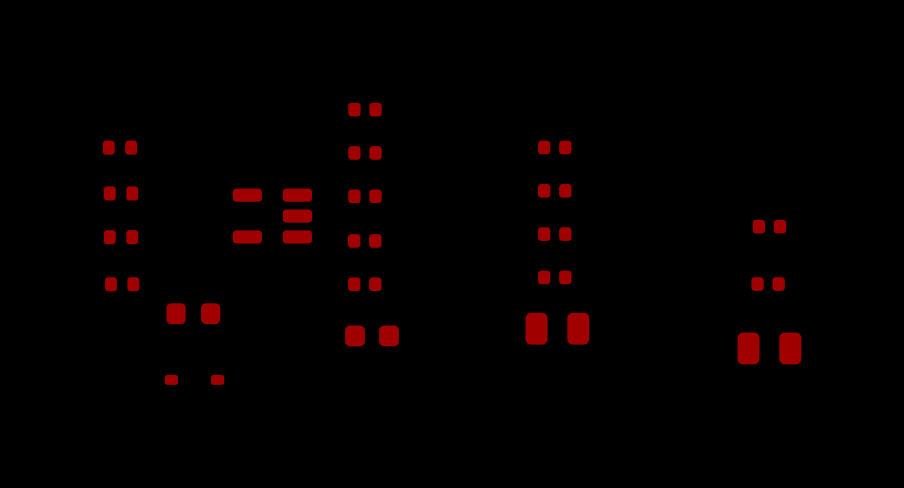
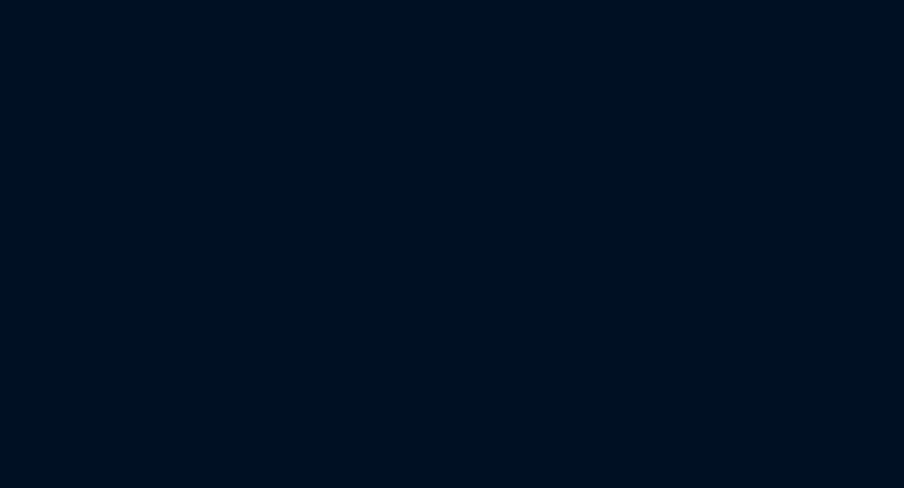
part: (364, 109) -> none
part: (119, 147) -> none
part: (554, 147) -> none
part: (364, 152) -> none
part: (554, 190) -> none
part: (121, 193) -> none
part: (364, 196) -> none
part: (272, 216) -> none
part: (769, 226) -> none
part: (554, 234) -> none
part: (121, 237) -> none
part: (364, 240) -> none
part: (554, 277) -> none
part: (122, 284) -> none
part: (364, 284) -> none
part: (768, 284) -> none
part: (193, 313) -> none
part: (557, 328) -> none
part: (372, 335) -> none
part: (769, 348) -> none
part: (194, 379) -> none

